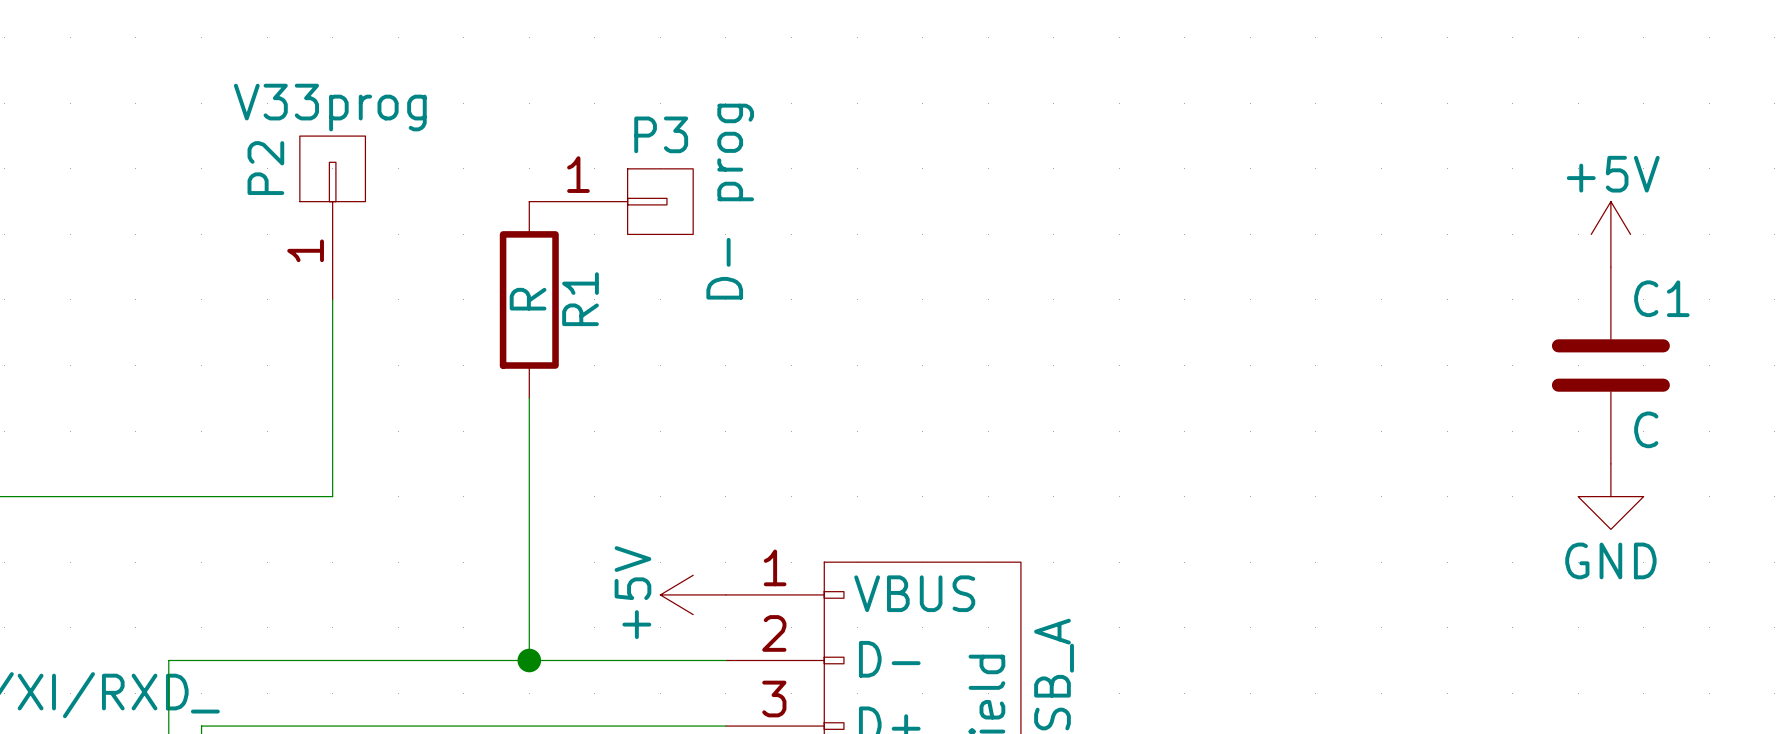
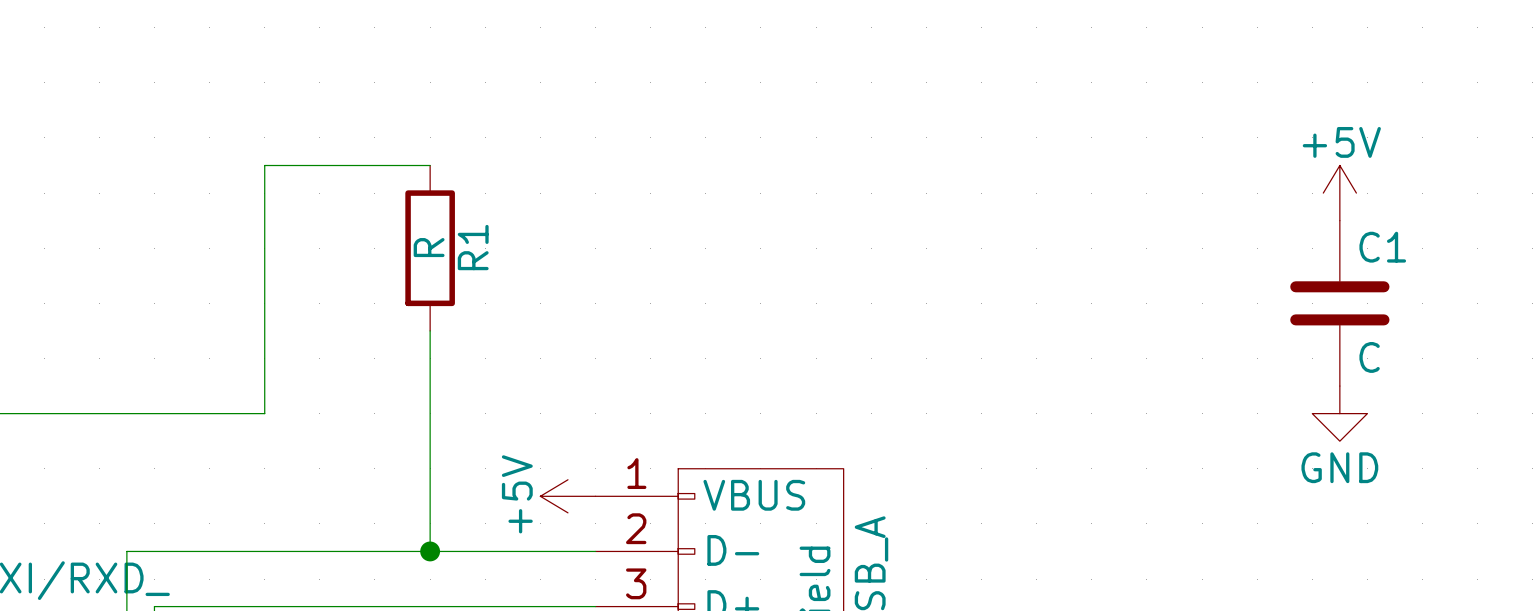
wire: none -> (430, 165) (264, 165) (264, 248)
P3: D- prog (611, 201) -> none
P2: V33prog (332, 218) -> none

